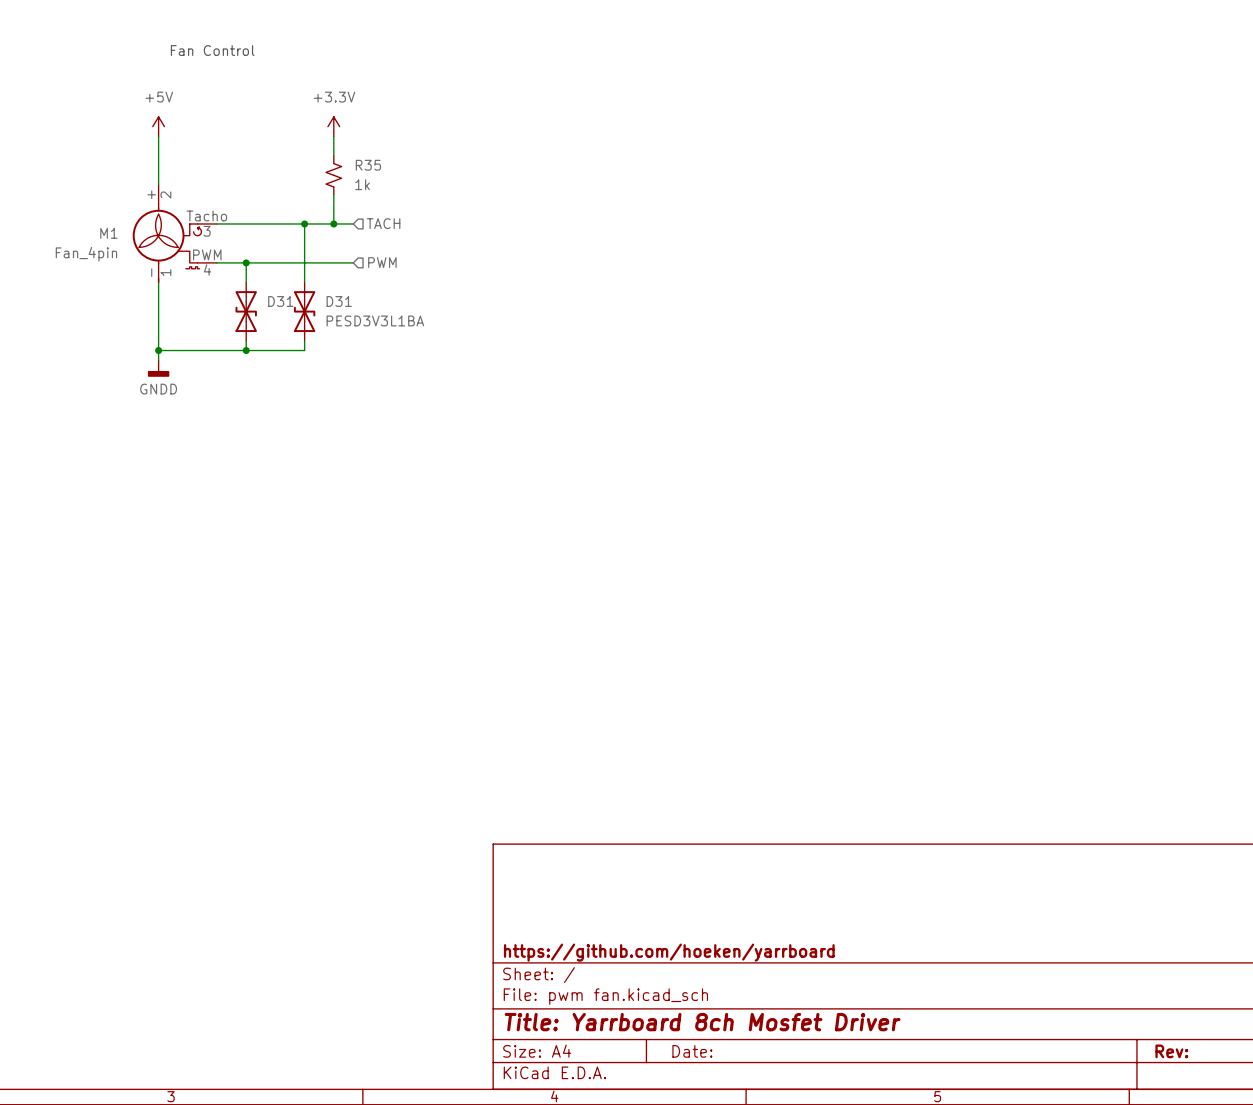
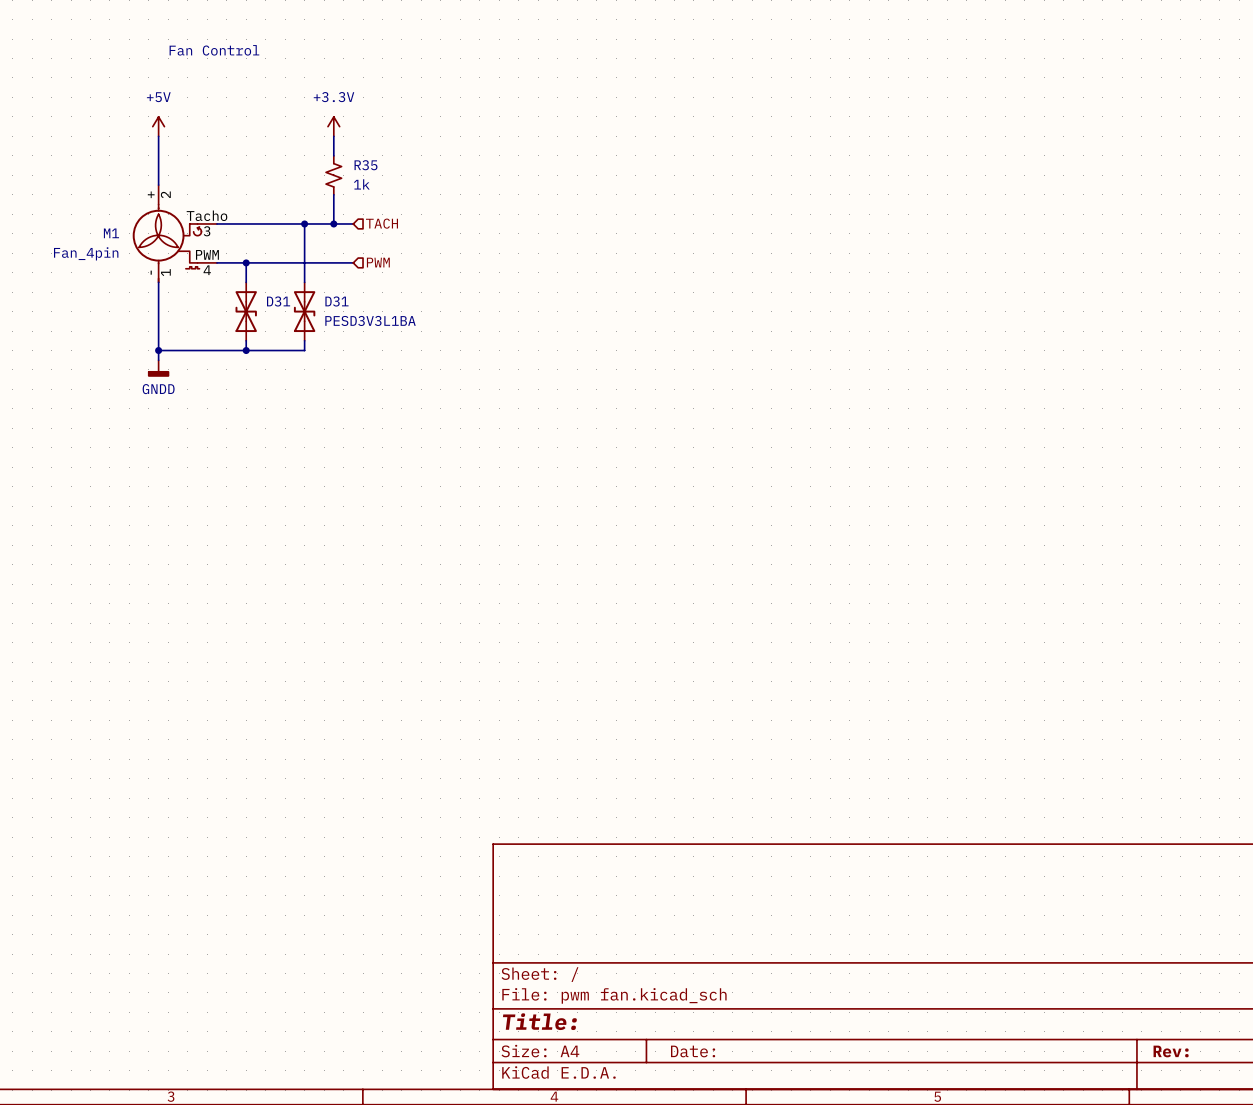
title block: https://github.com/hoeken/yarrboard (669, 952) -> none
title block: Title: Yarrboard 8ch Mosfet Driver (702, 1022) -> Title: (539, 1021)

